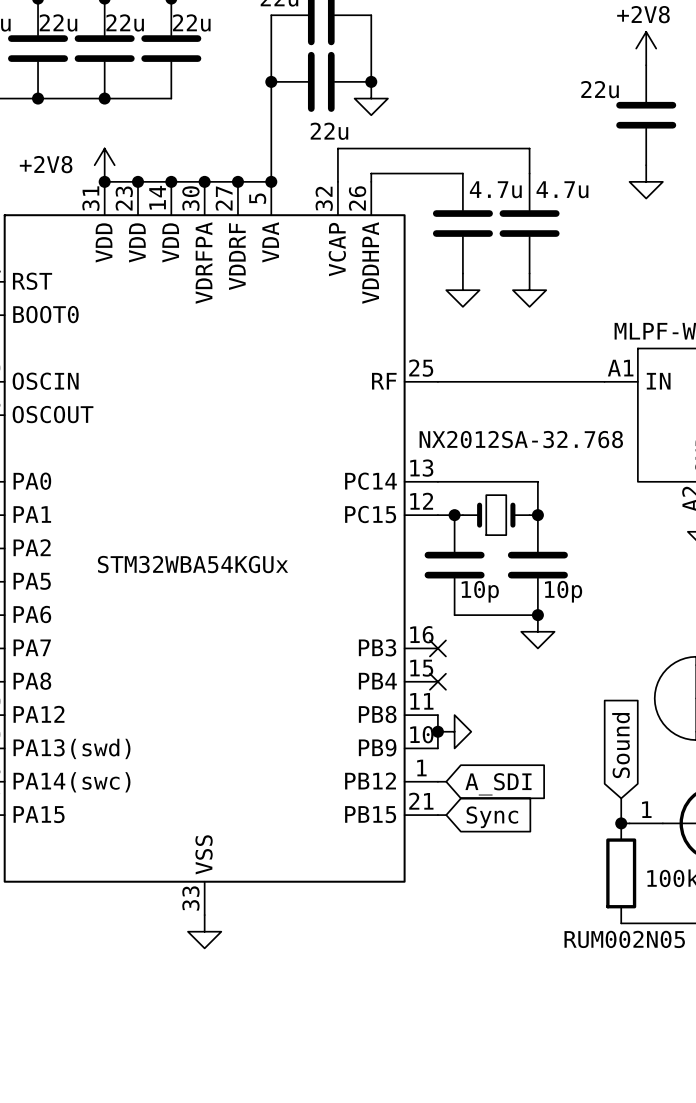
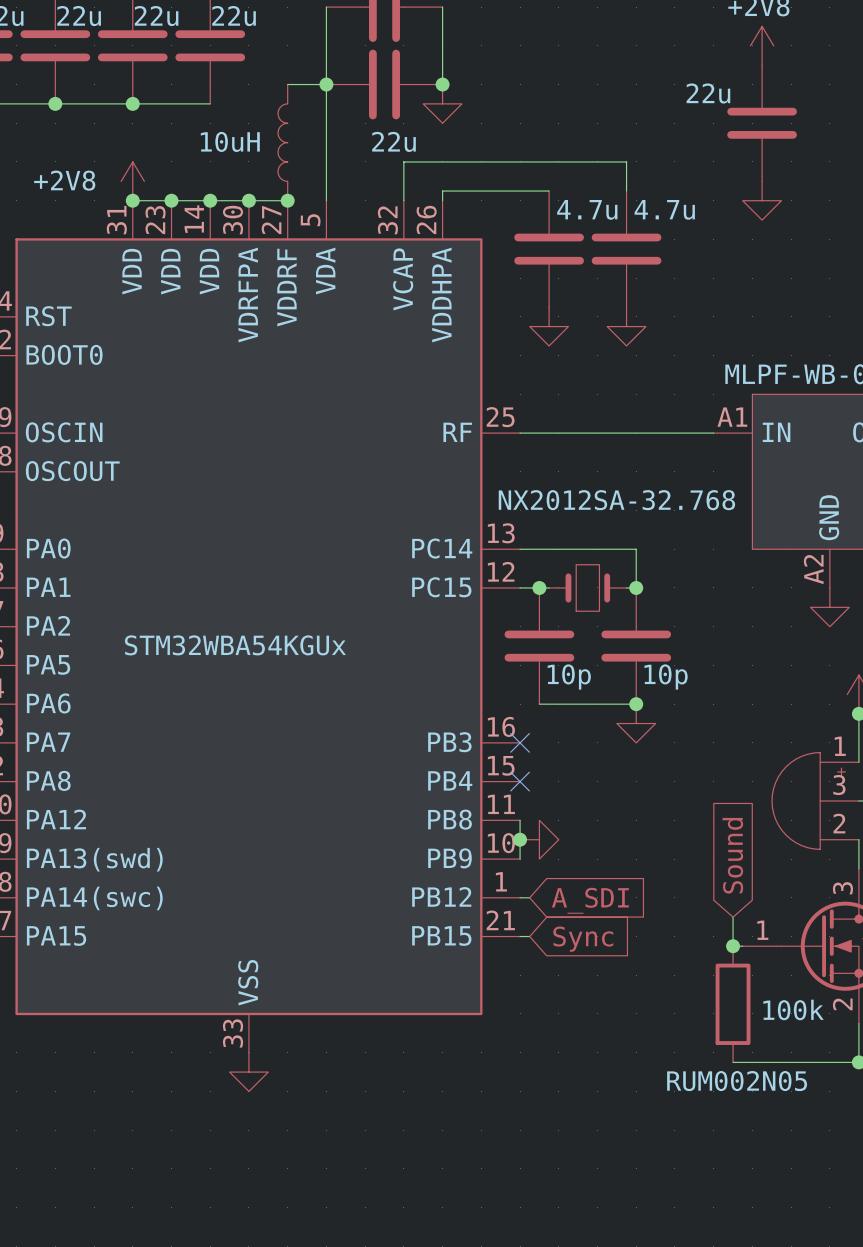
part: none -> 10uH (282, 142)
wire: (237, 181) (271, 181) -> (287, 84) (326, 84)
junction: (271, 181) -> none

